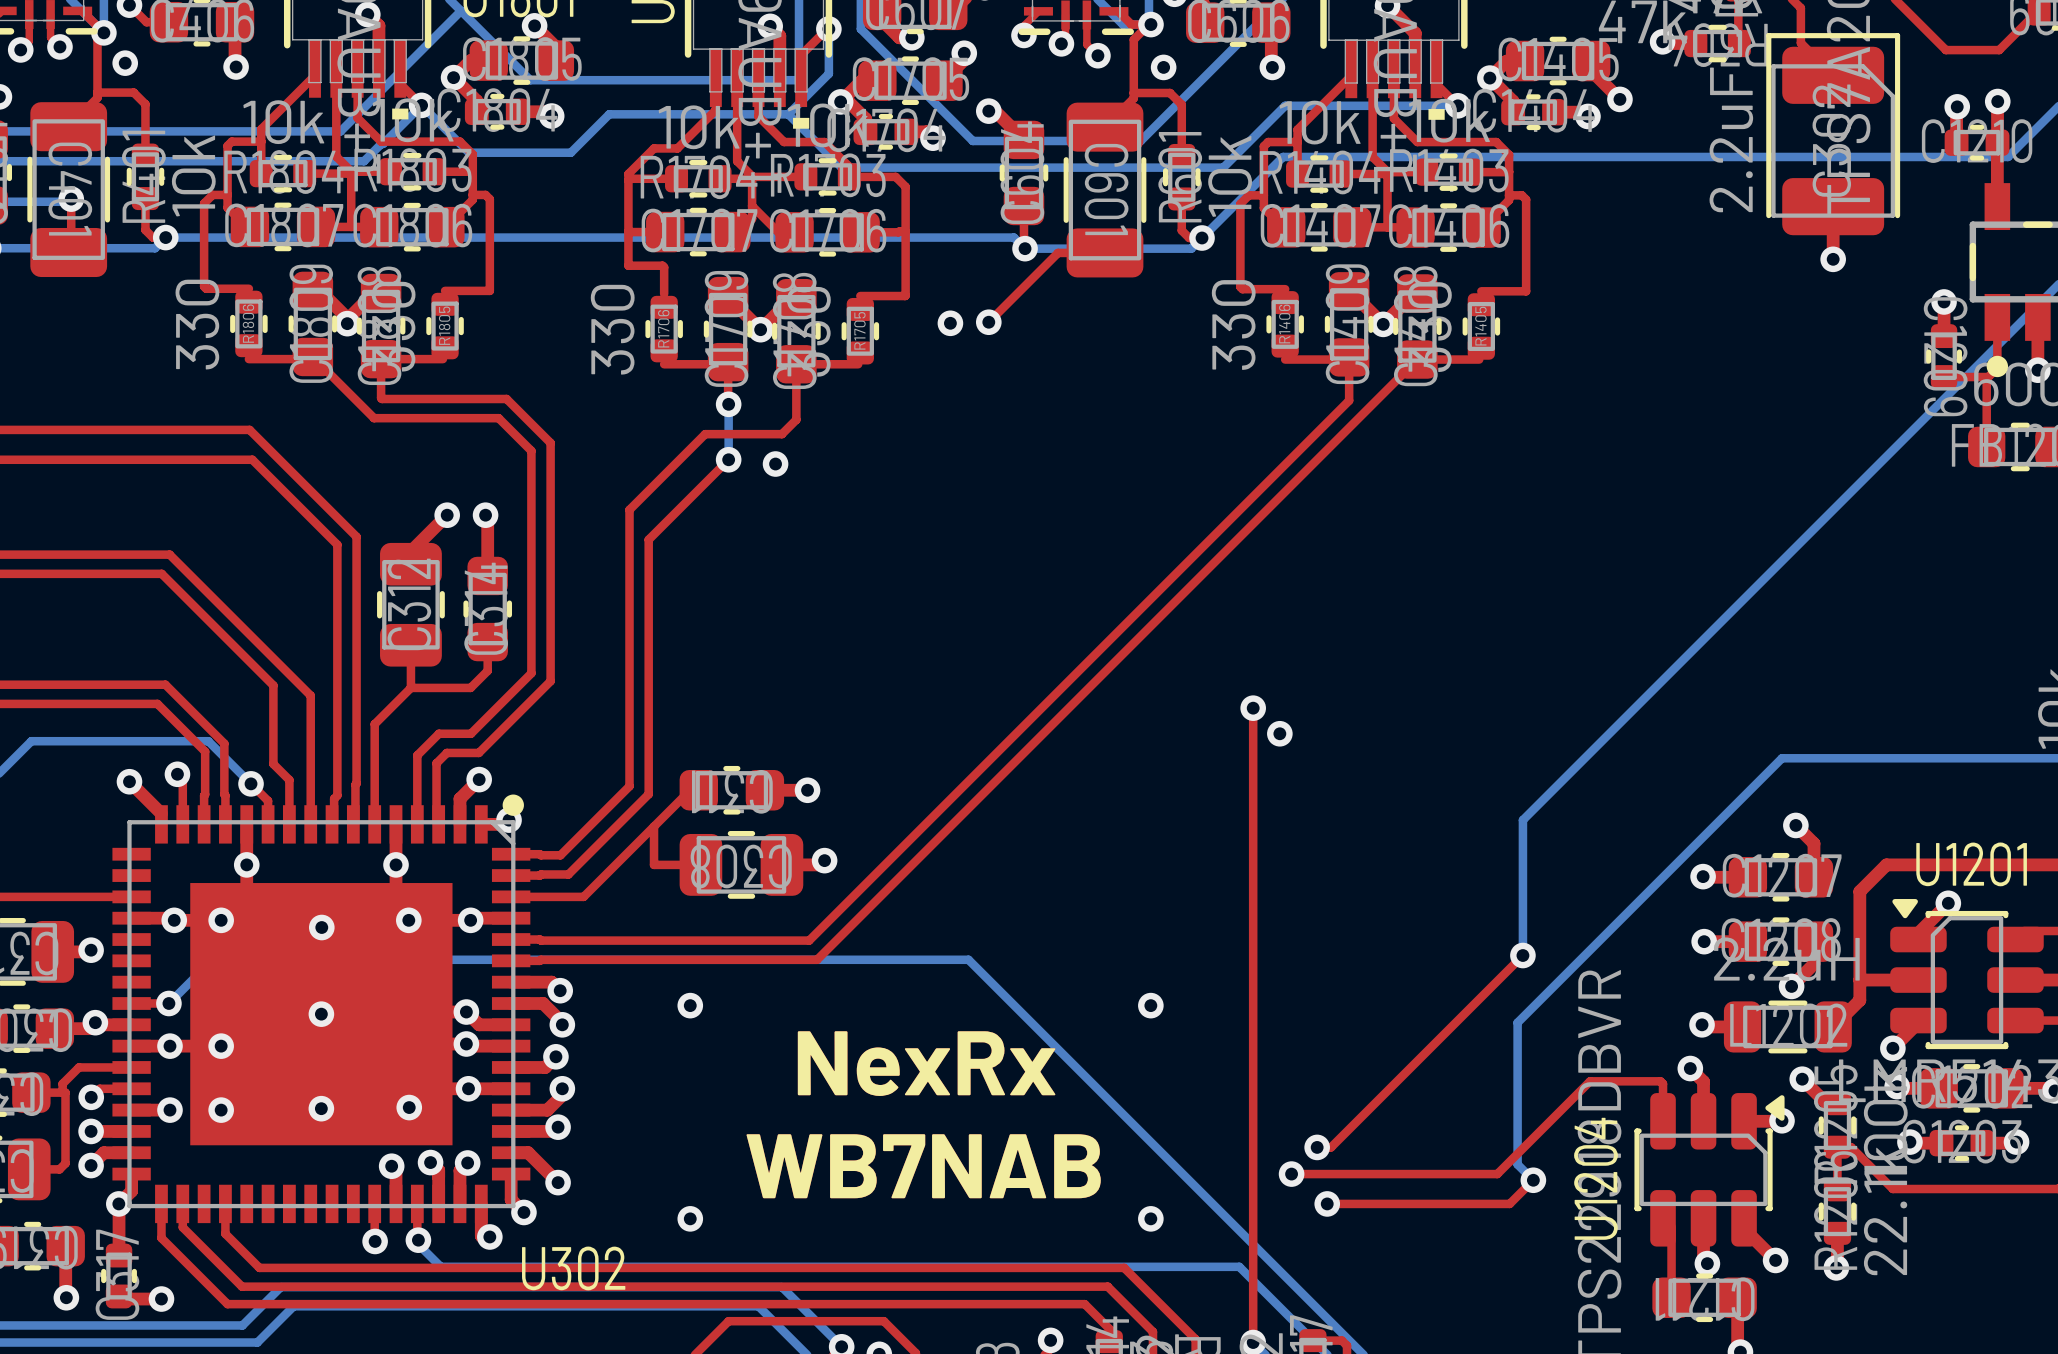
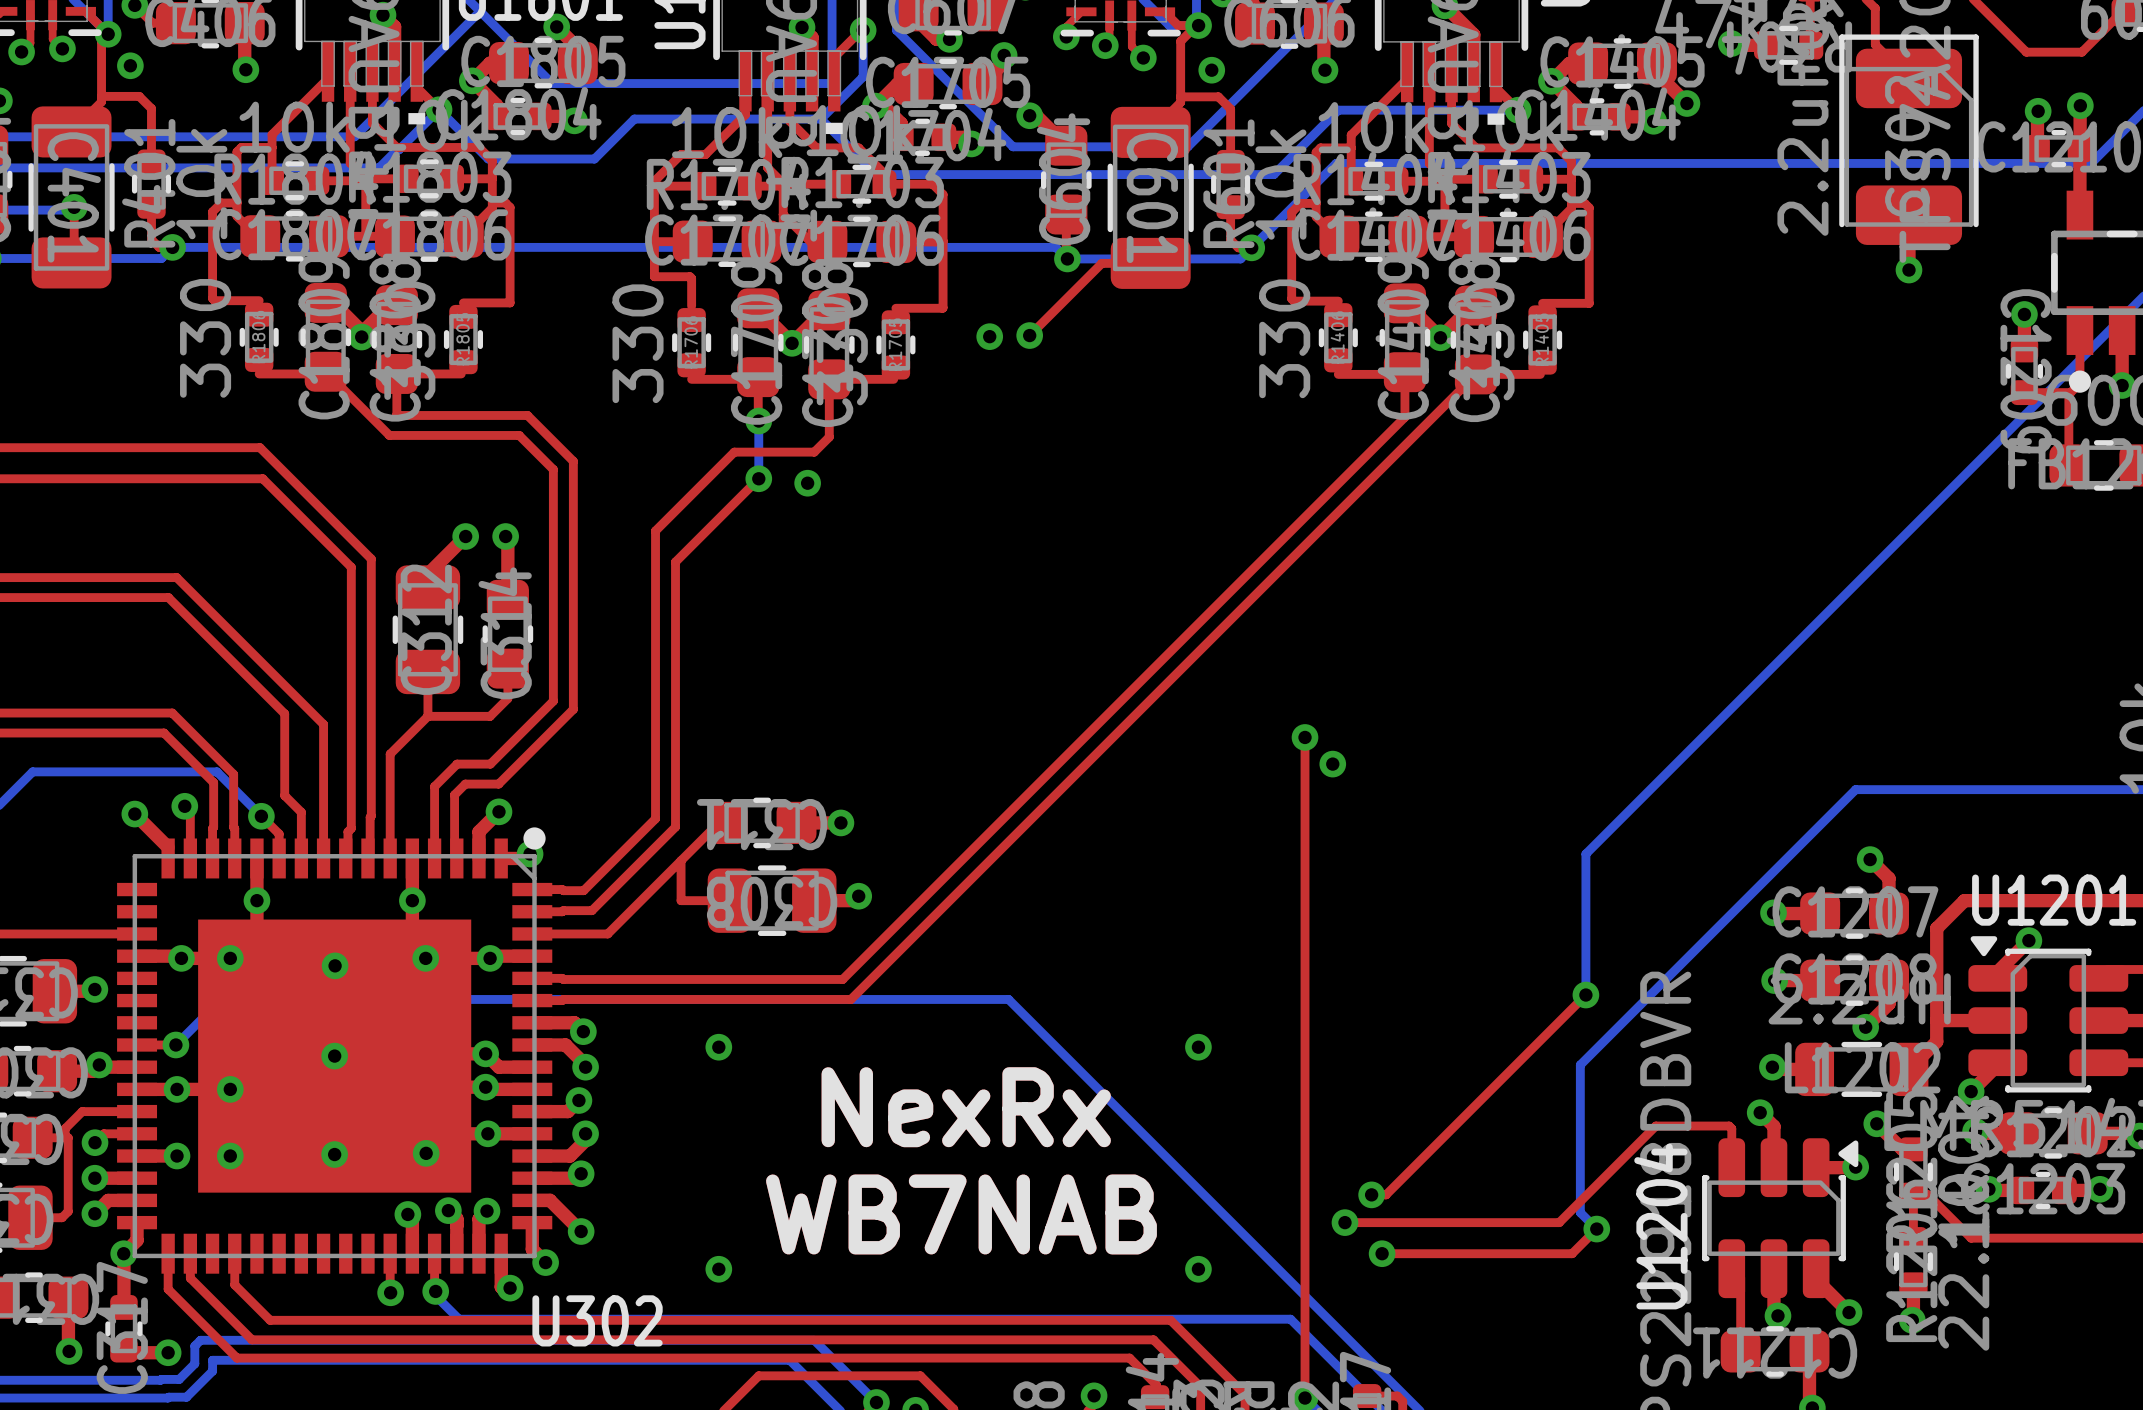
bottom track: (280, 1287) (242, 1325) (154, 1325) -> (292, 1340) (200, 1340) (194, 1346) (194, 1363) (179, 1379) (160, 1380)
bottom track: (293, 1306) (257, 1342) (161, 1342) -> (305, 1360) (212, 1360) (212, 1371) (186, 1397) (167, 1398)

